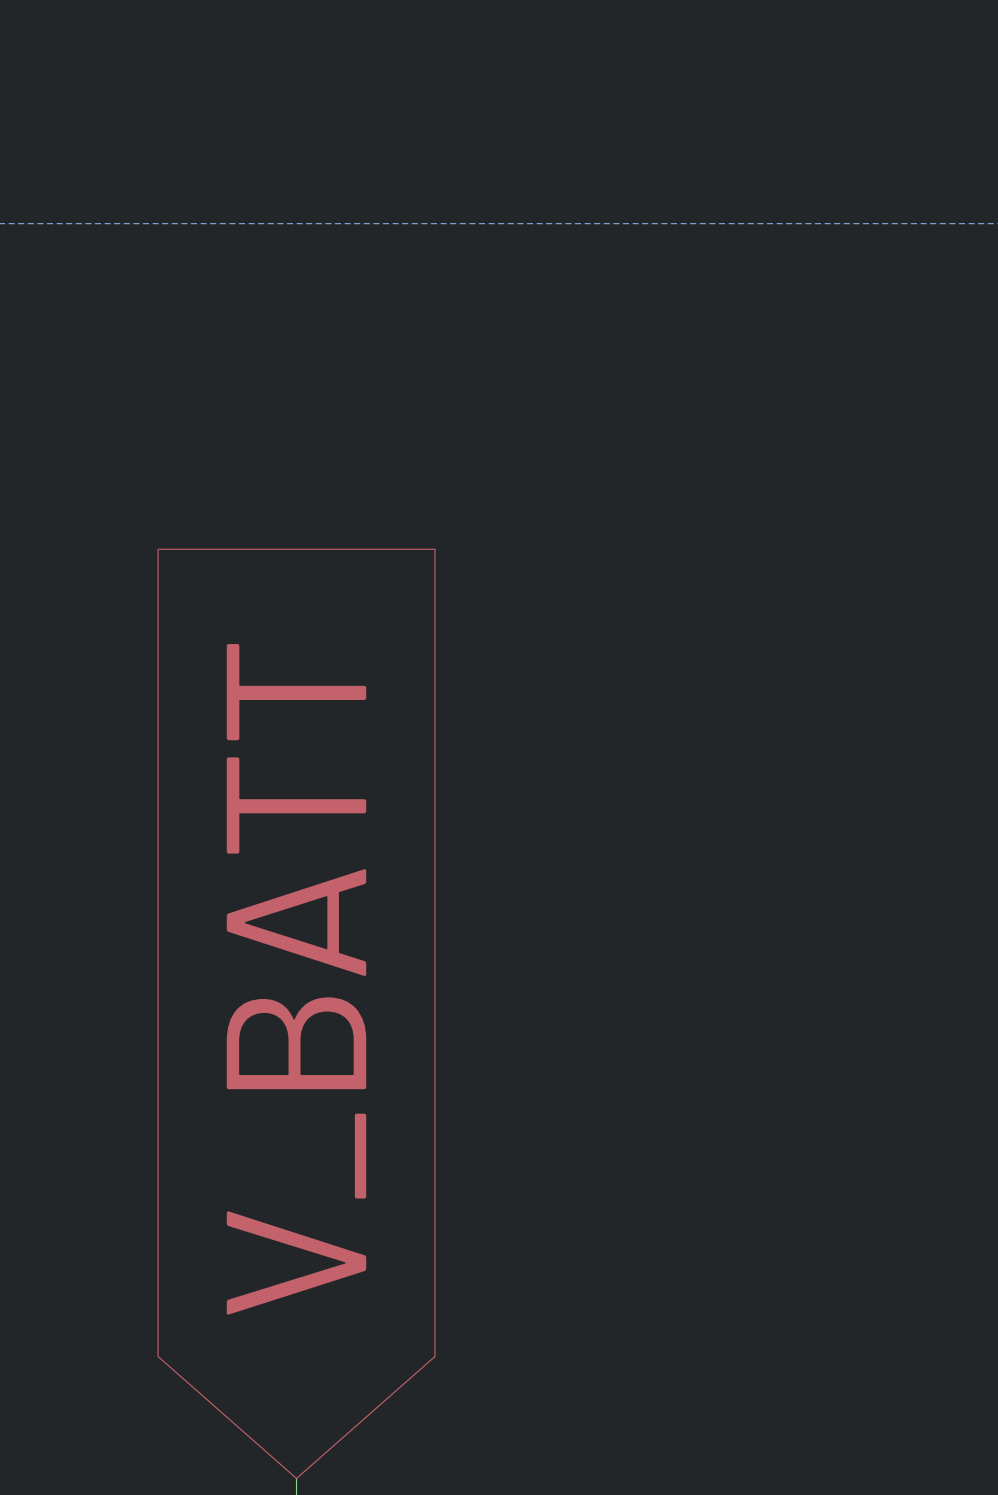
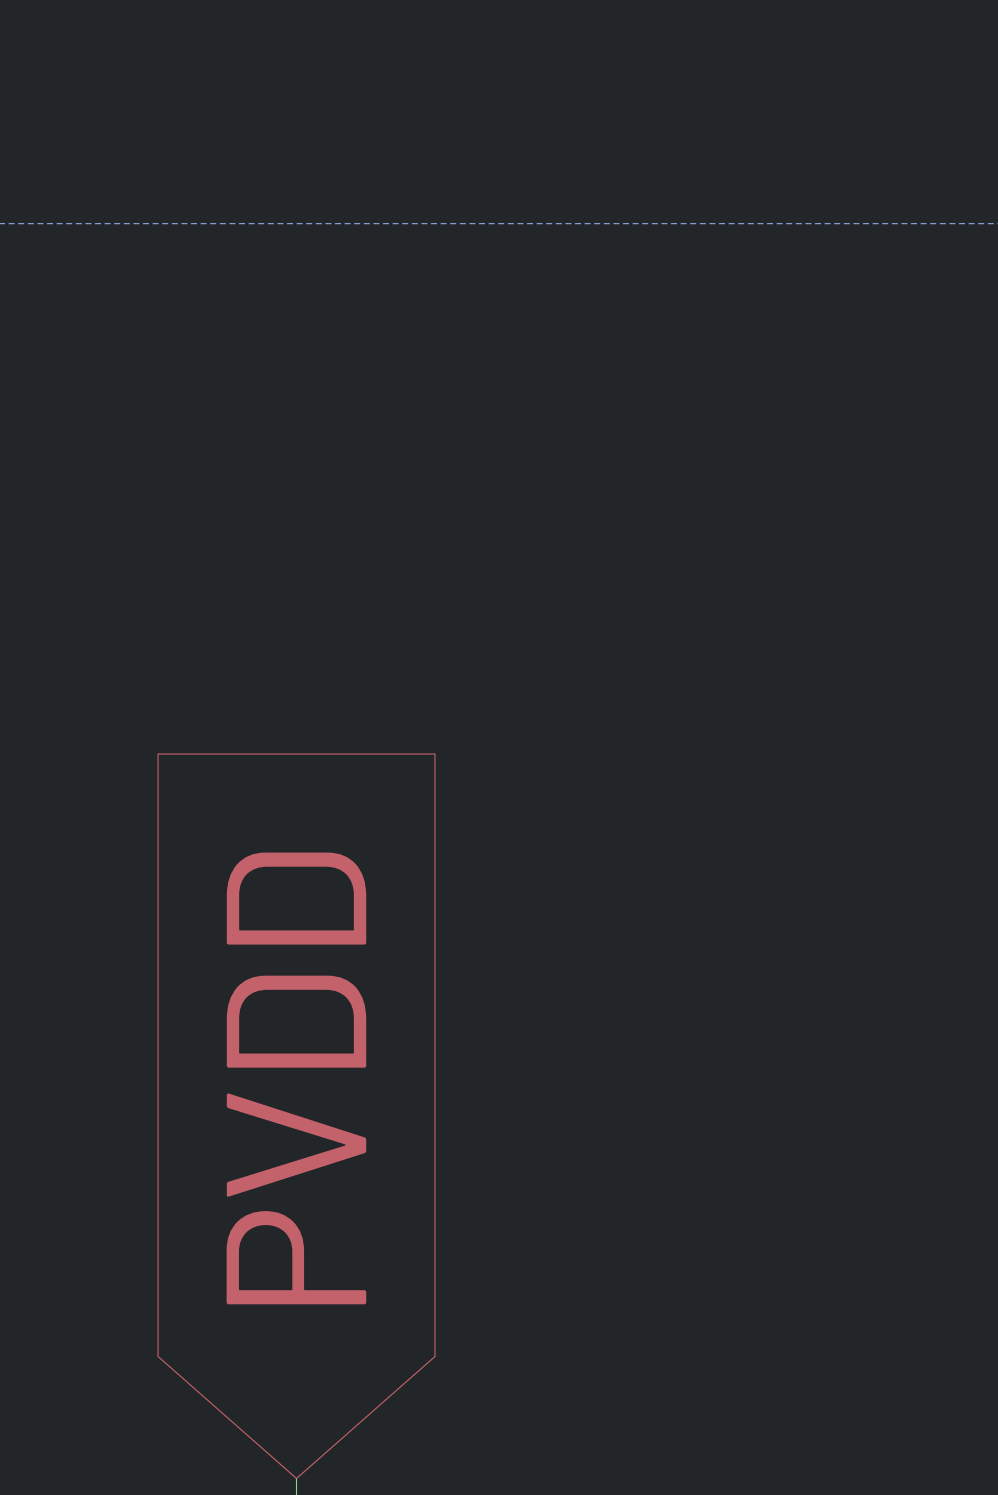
global label: V_BATT (296, 979) -> PVDD (296, 1078)

